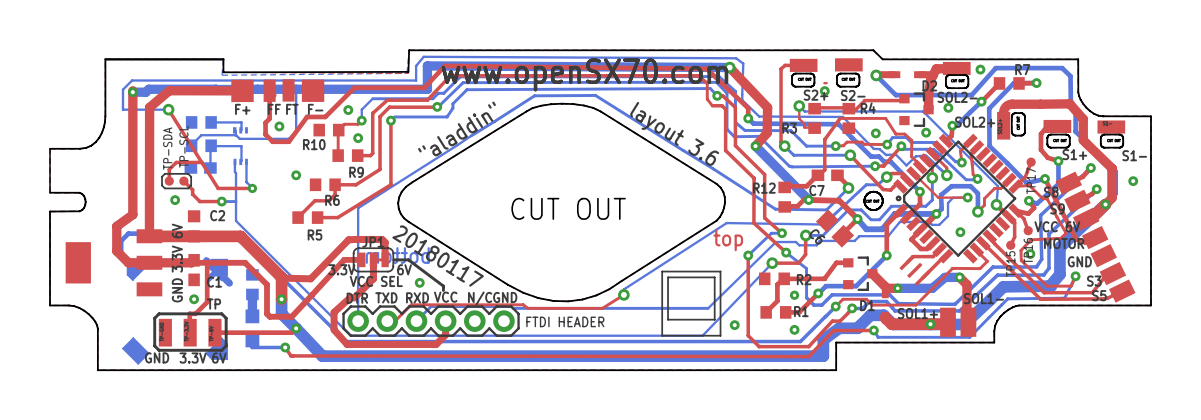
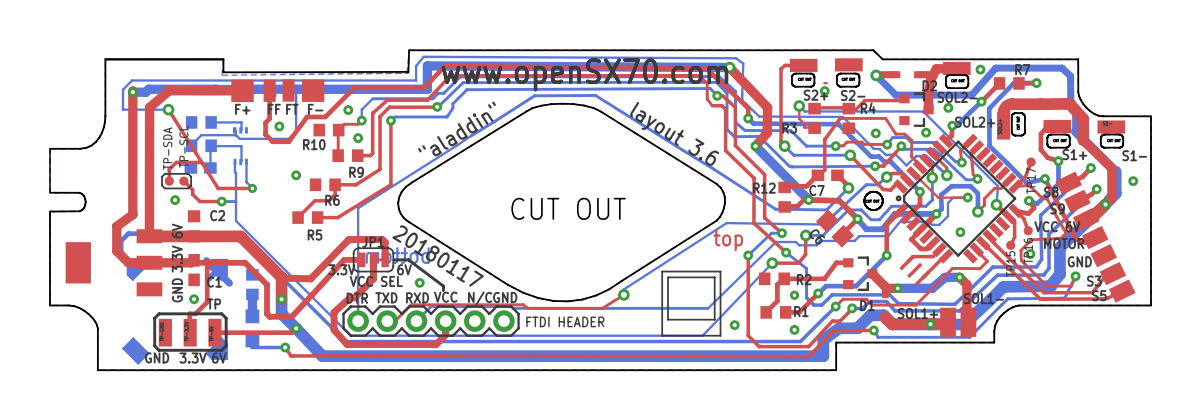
bottom track width: thin (876, 75) (895, 95) (971, 95) (995, 68) (1062, 68) (1070, 76) (1070, 104) (1075, 110) (1075, 131) (1115, 171) (1115, 193) (1108, 200) -> thick (876, 75) (895, 95) (971, 95) (995, 68) (1062, 68) (1070, 76) (1070, 104) (1075, 110) (1075, 131) (1115, 171) (1115, 193) (1108, 200)
top track width: thin (1003, 125) (1003, 110) (1009, 104) (1069, 103) (1083, 119) (1083, 140) -> thick (1003, 125) (1003, 110) (1009, 104) (1069, 103) (1083, 119) (1083, 140)

